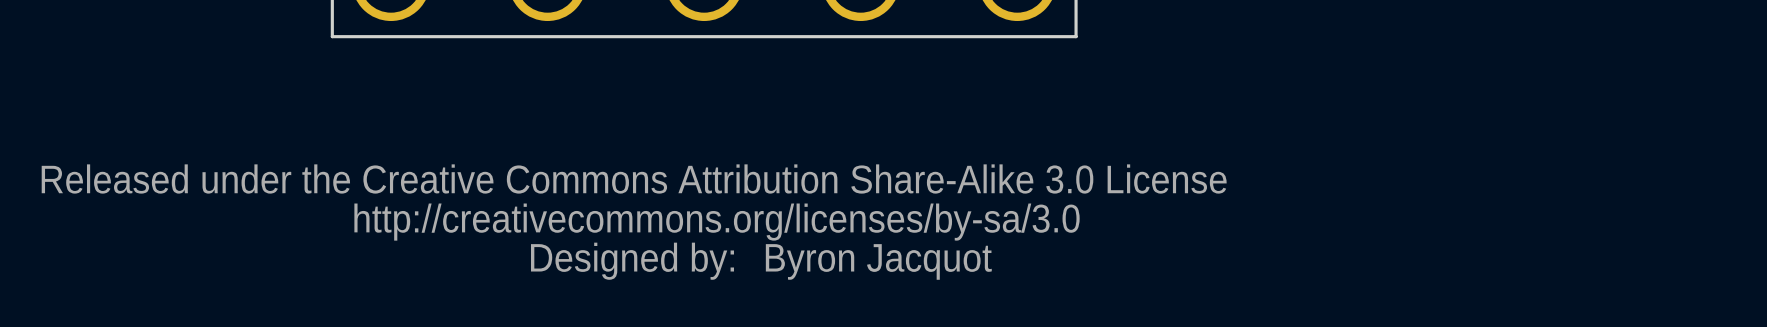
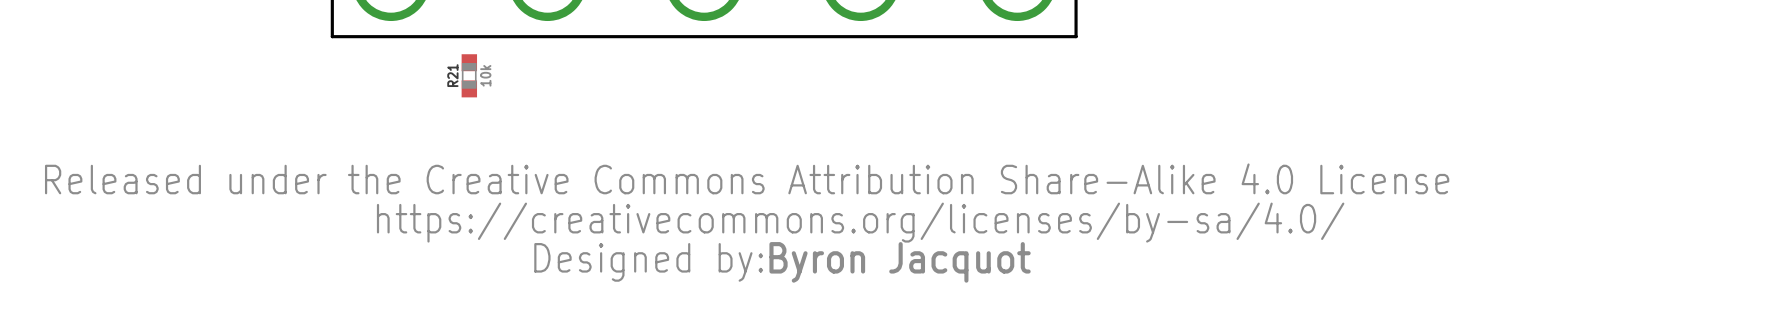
R21: none -> 10k (469, 75)
drawing shape: [41, 164, 1227, 280] -> [44, 163, 1450, 282]

